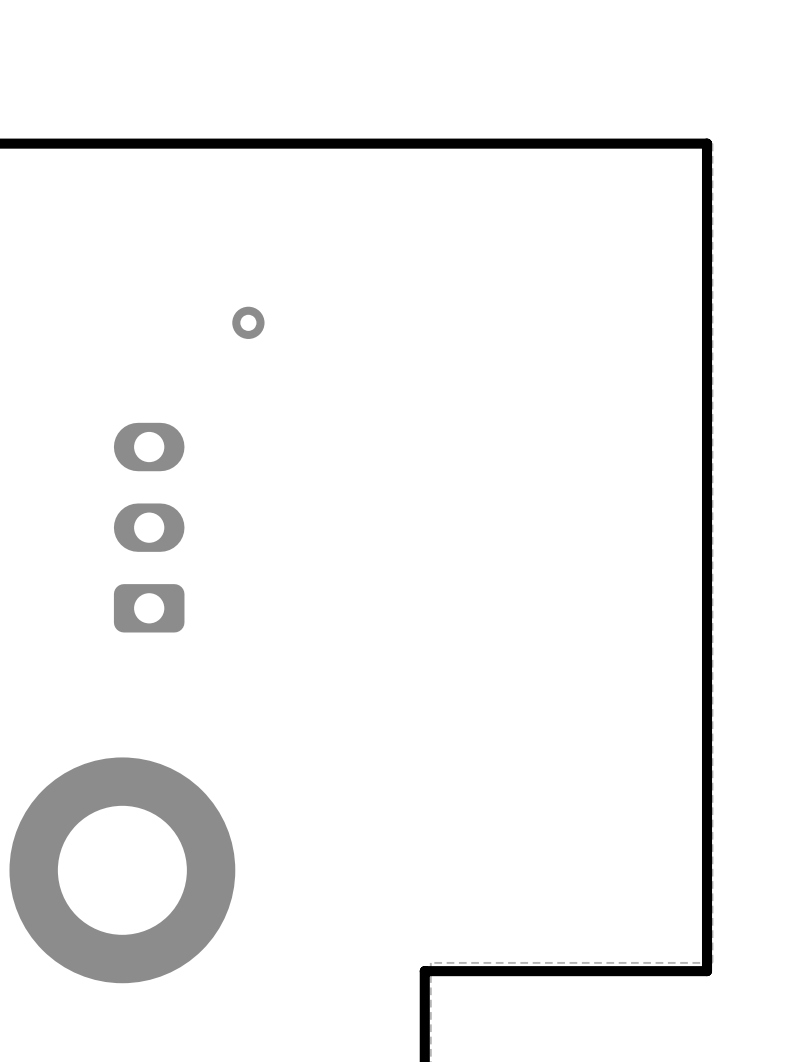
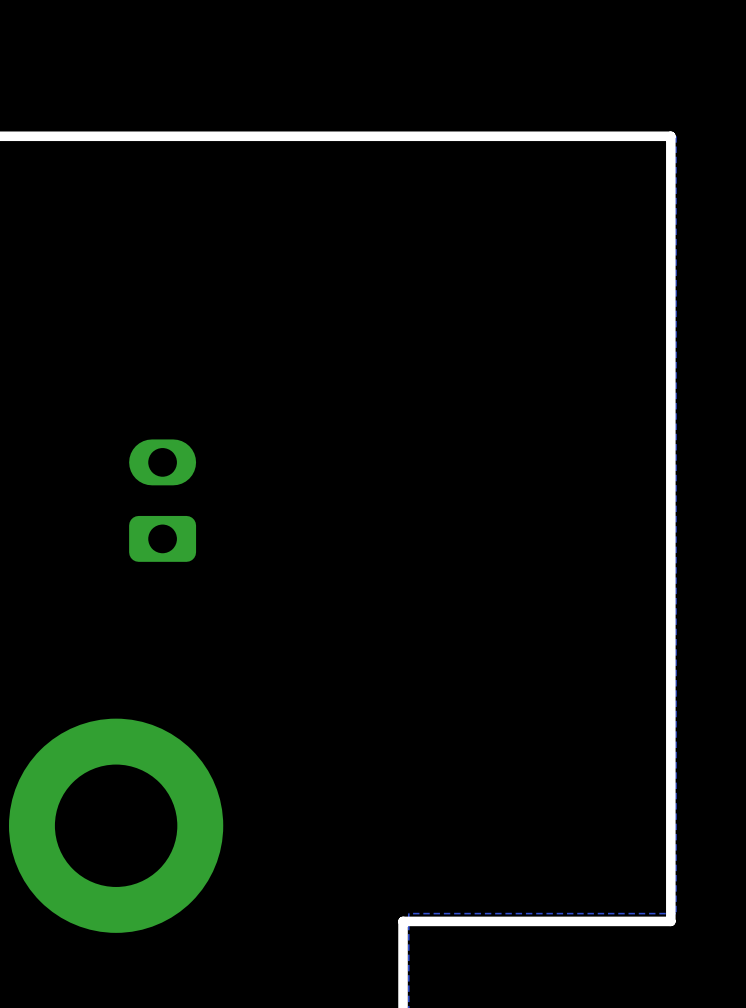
via: (248, 322) -> none
part footprint: [113, 422, 185, 633] -> [129, 439, 197, 562]

